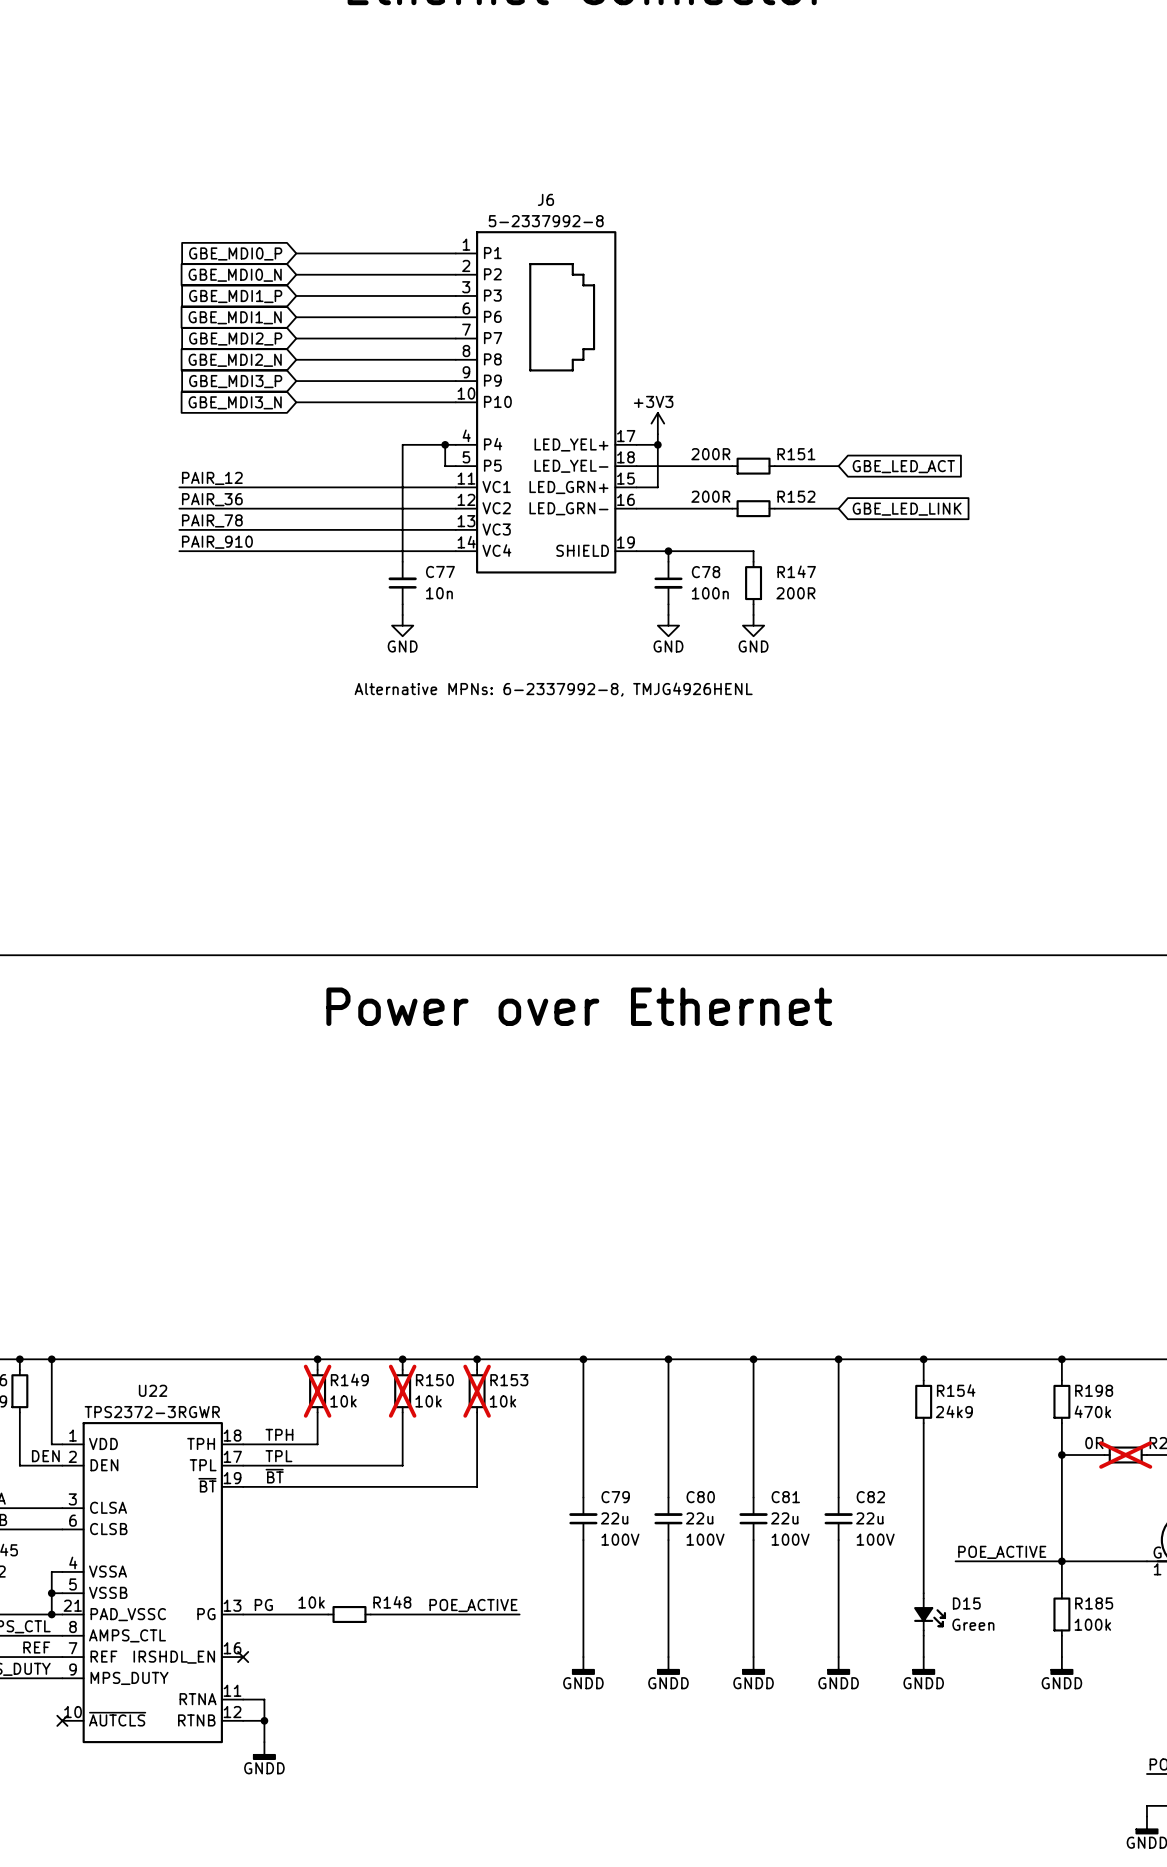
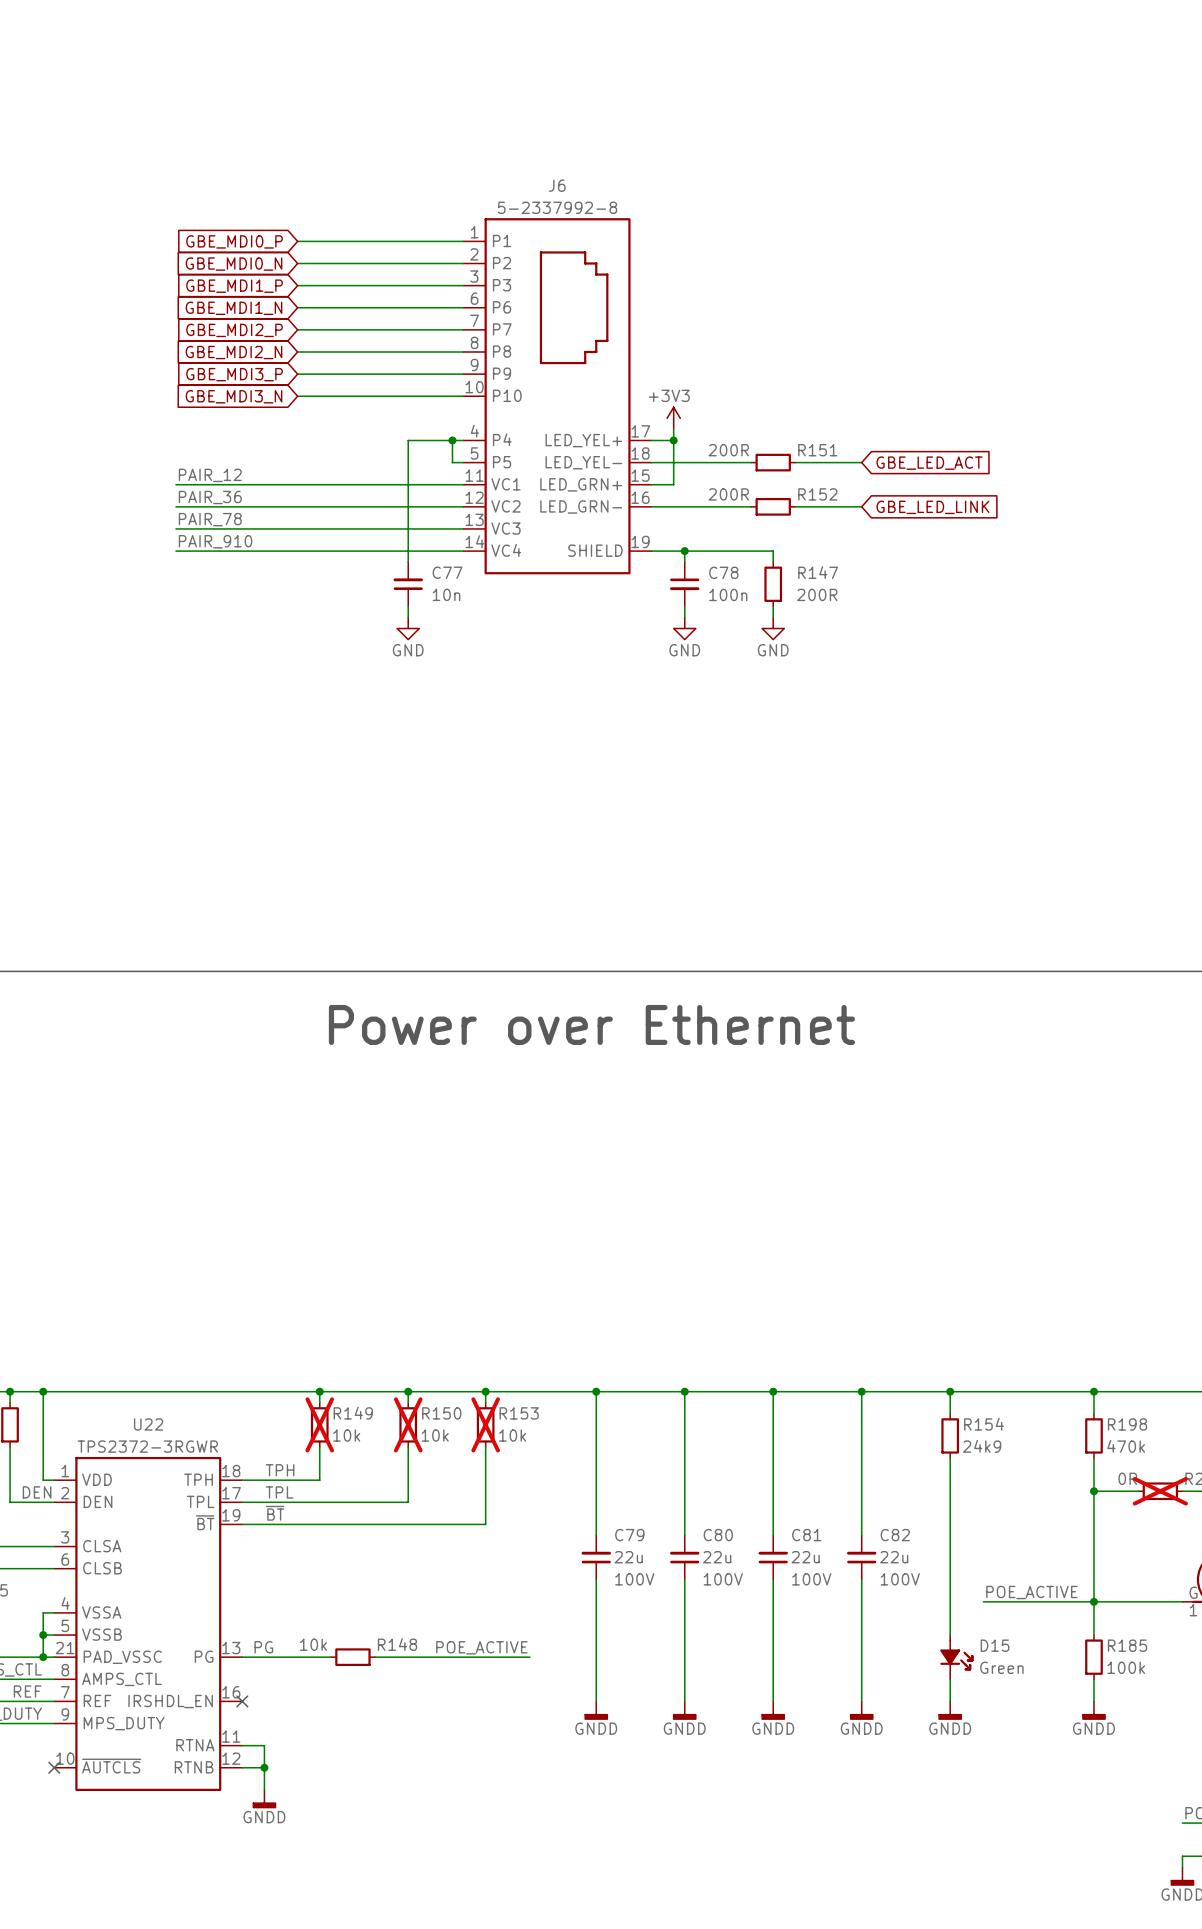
text: Alternative MPNs: 6-2337992-8, TMJG4926HENL (553, 689) -> none

